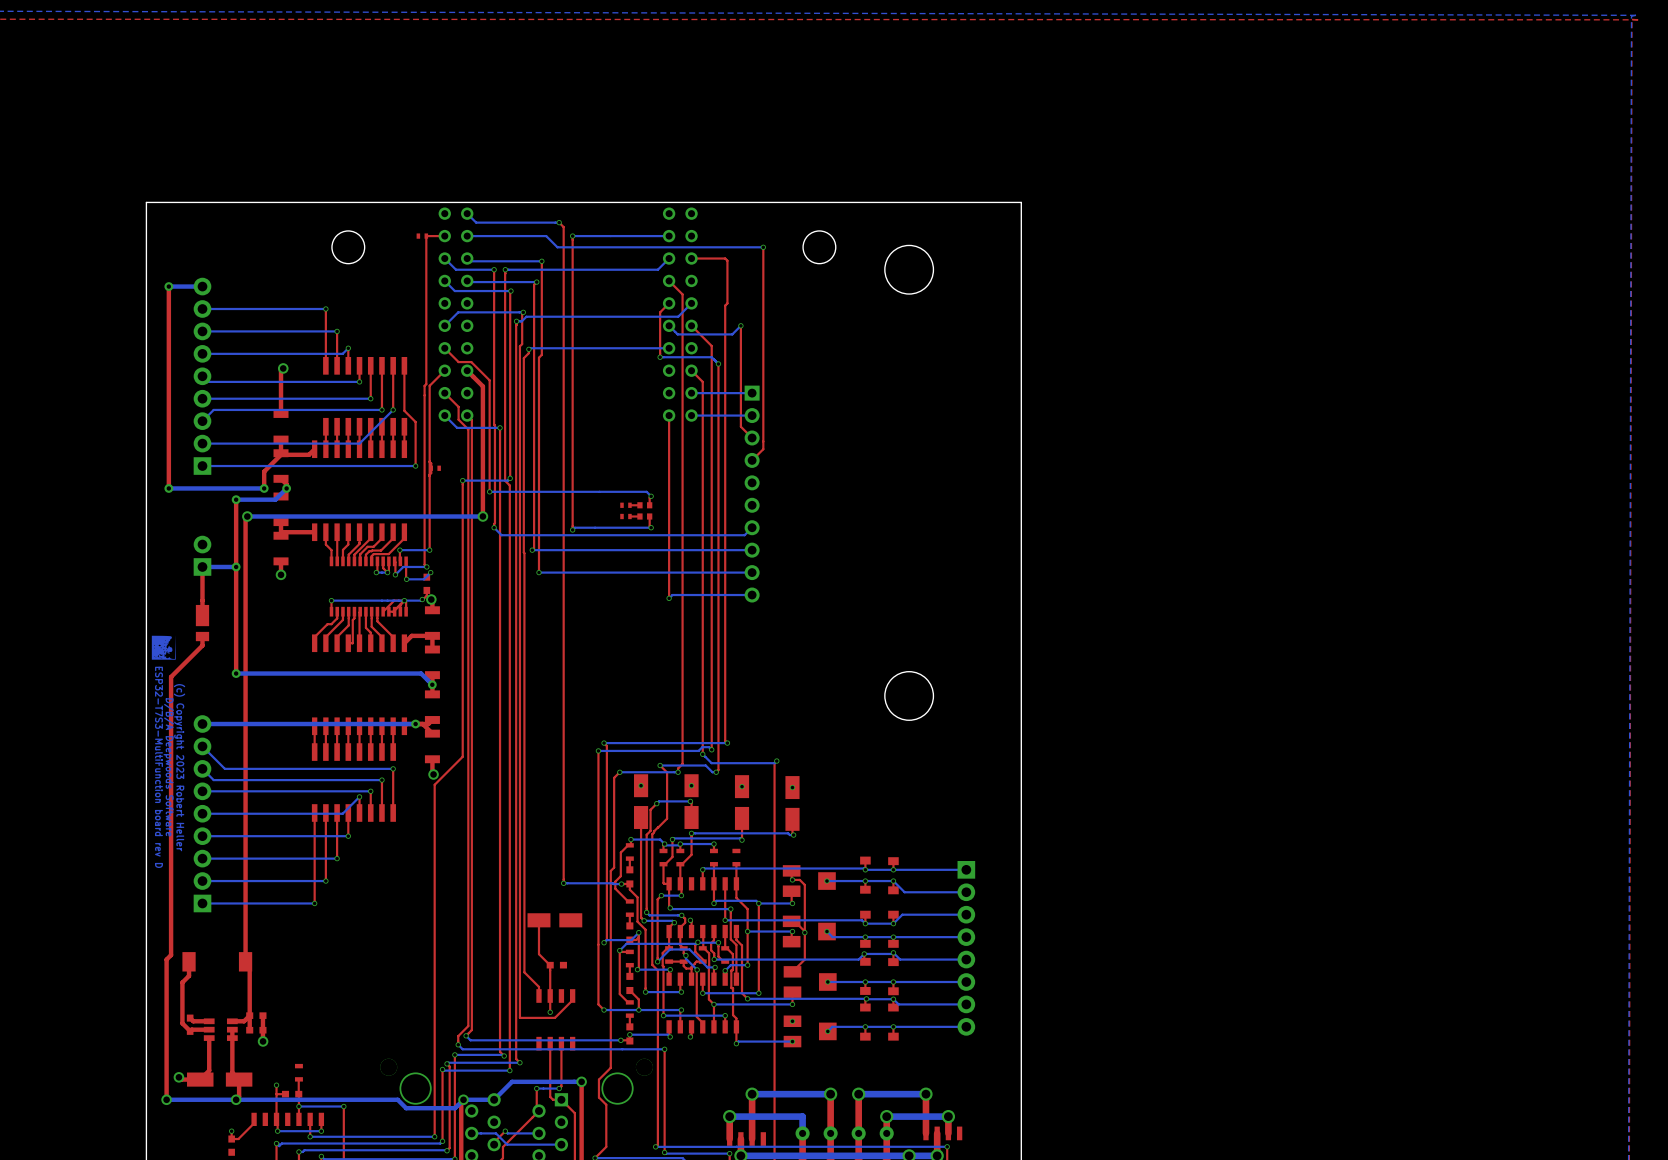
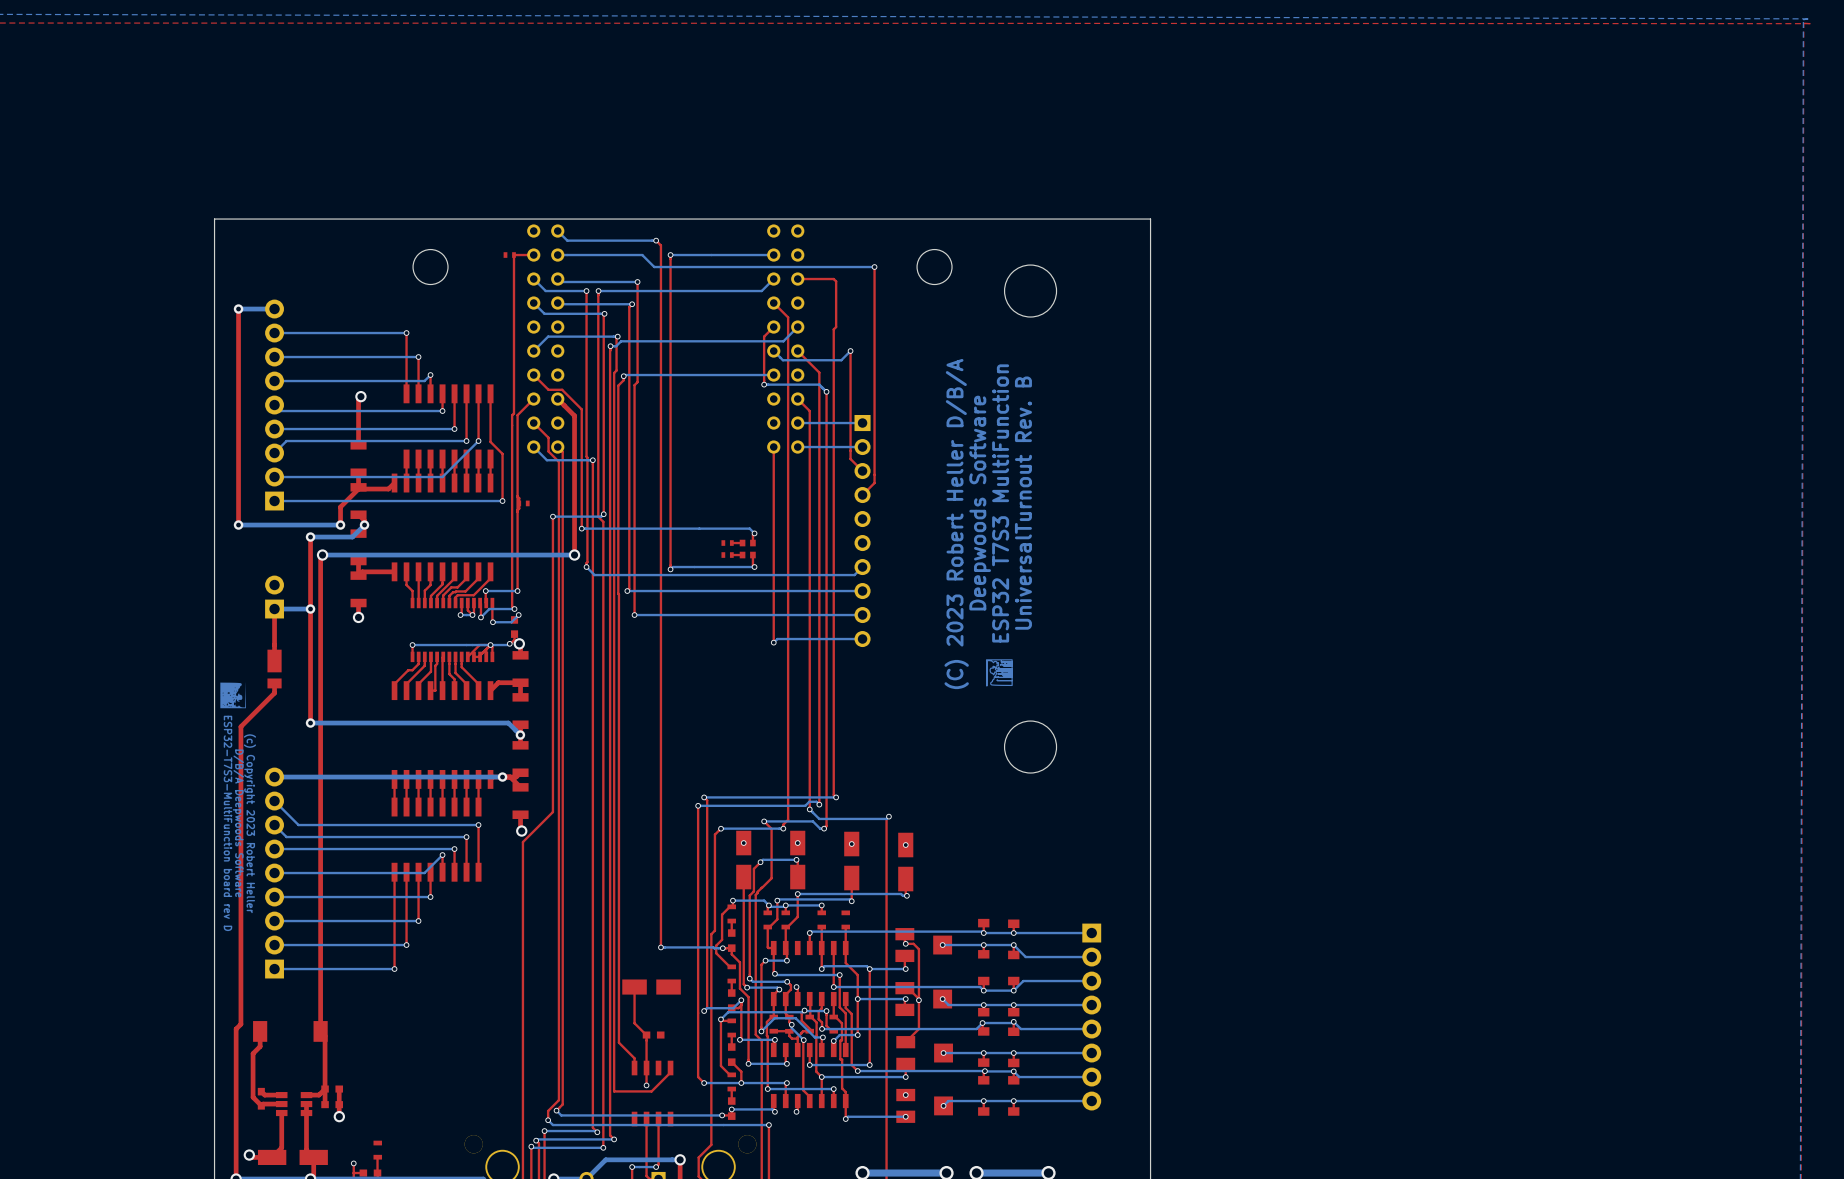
text: none -> Deepwoods Software (980, 503)
text: none -> UniversalTurnout Rev. B (1023, 503)
text: none -> ESP32 T7S3 MultiFunction (1000, 503)
text: none -> (C) 2023 Robert Heller D/B/A (956, 524)
drawing: none -> [986, 659, 1013, 686]

